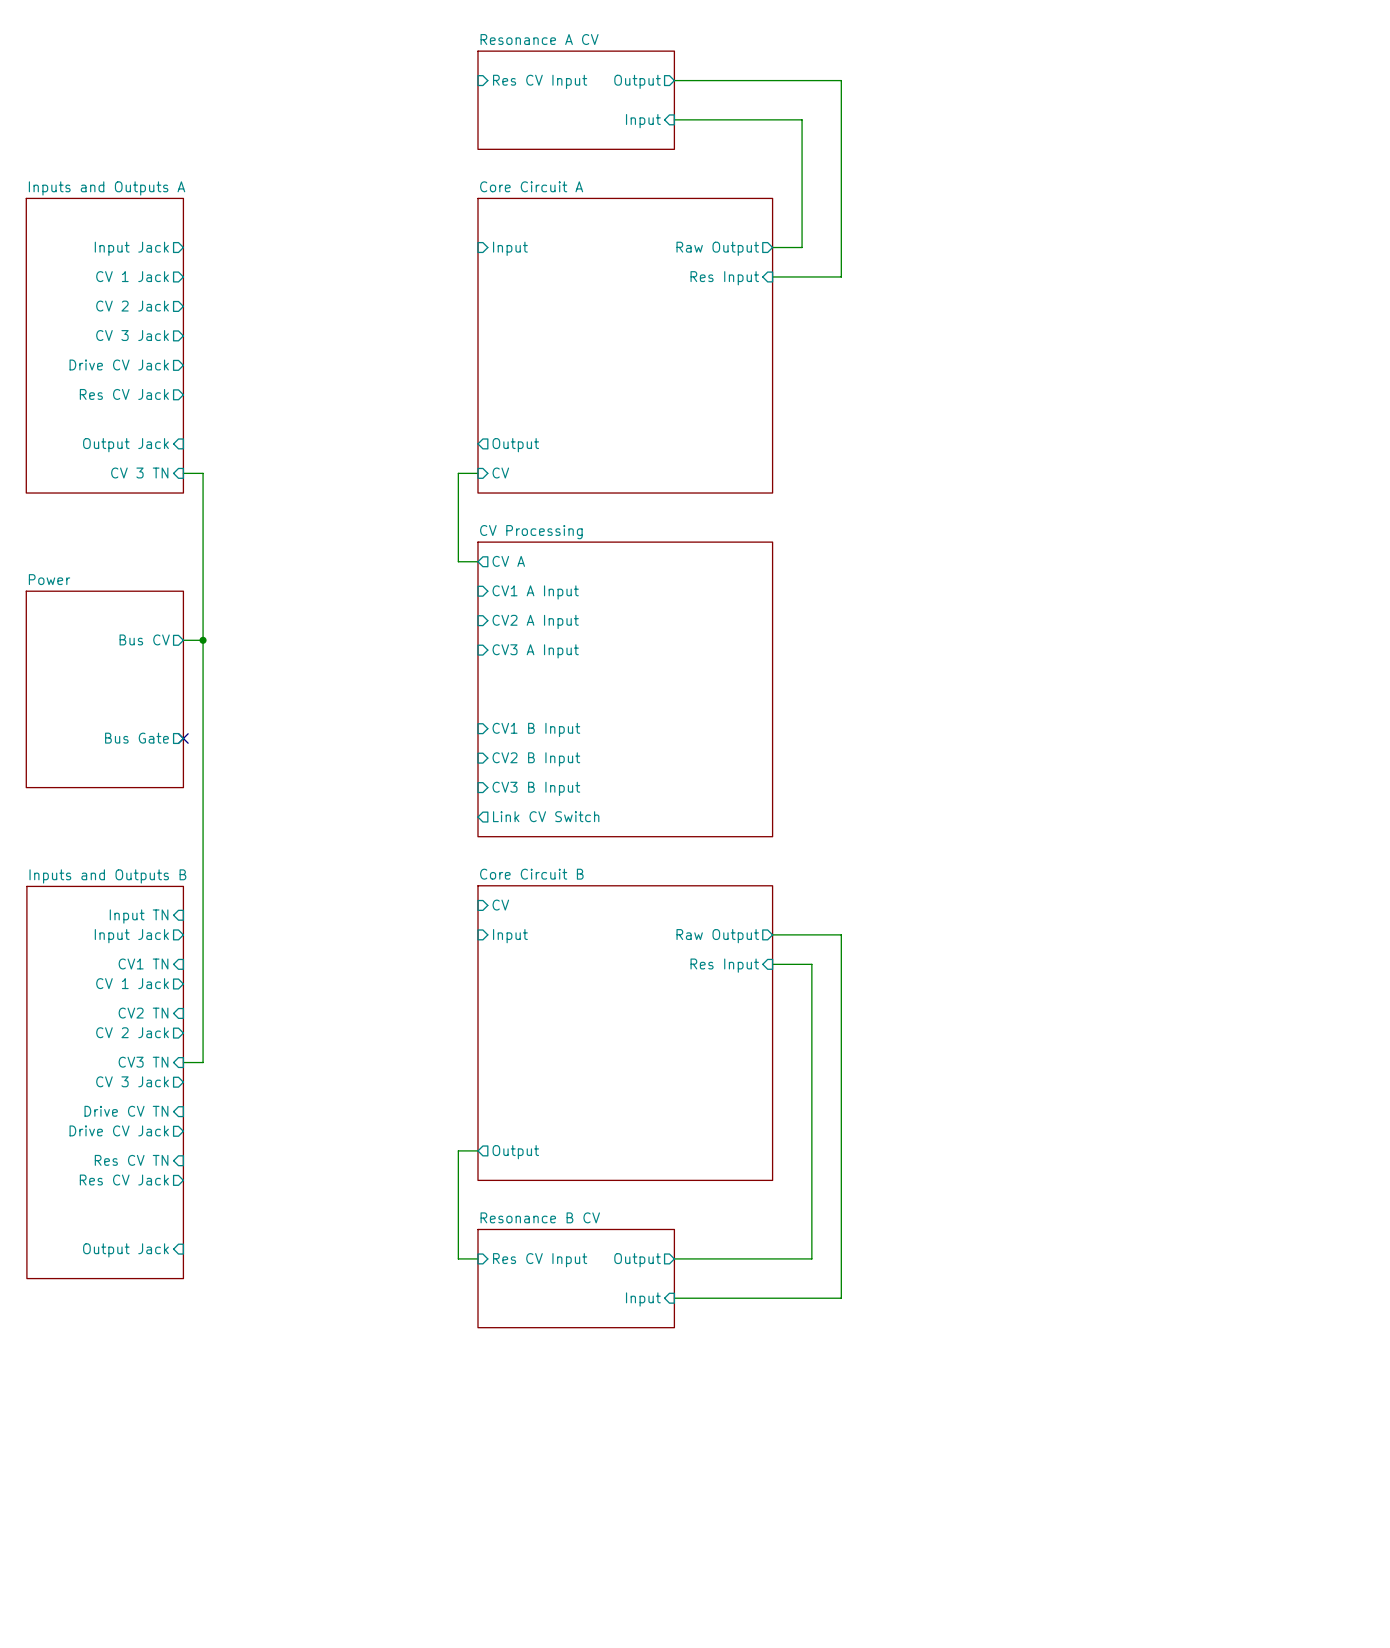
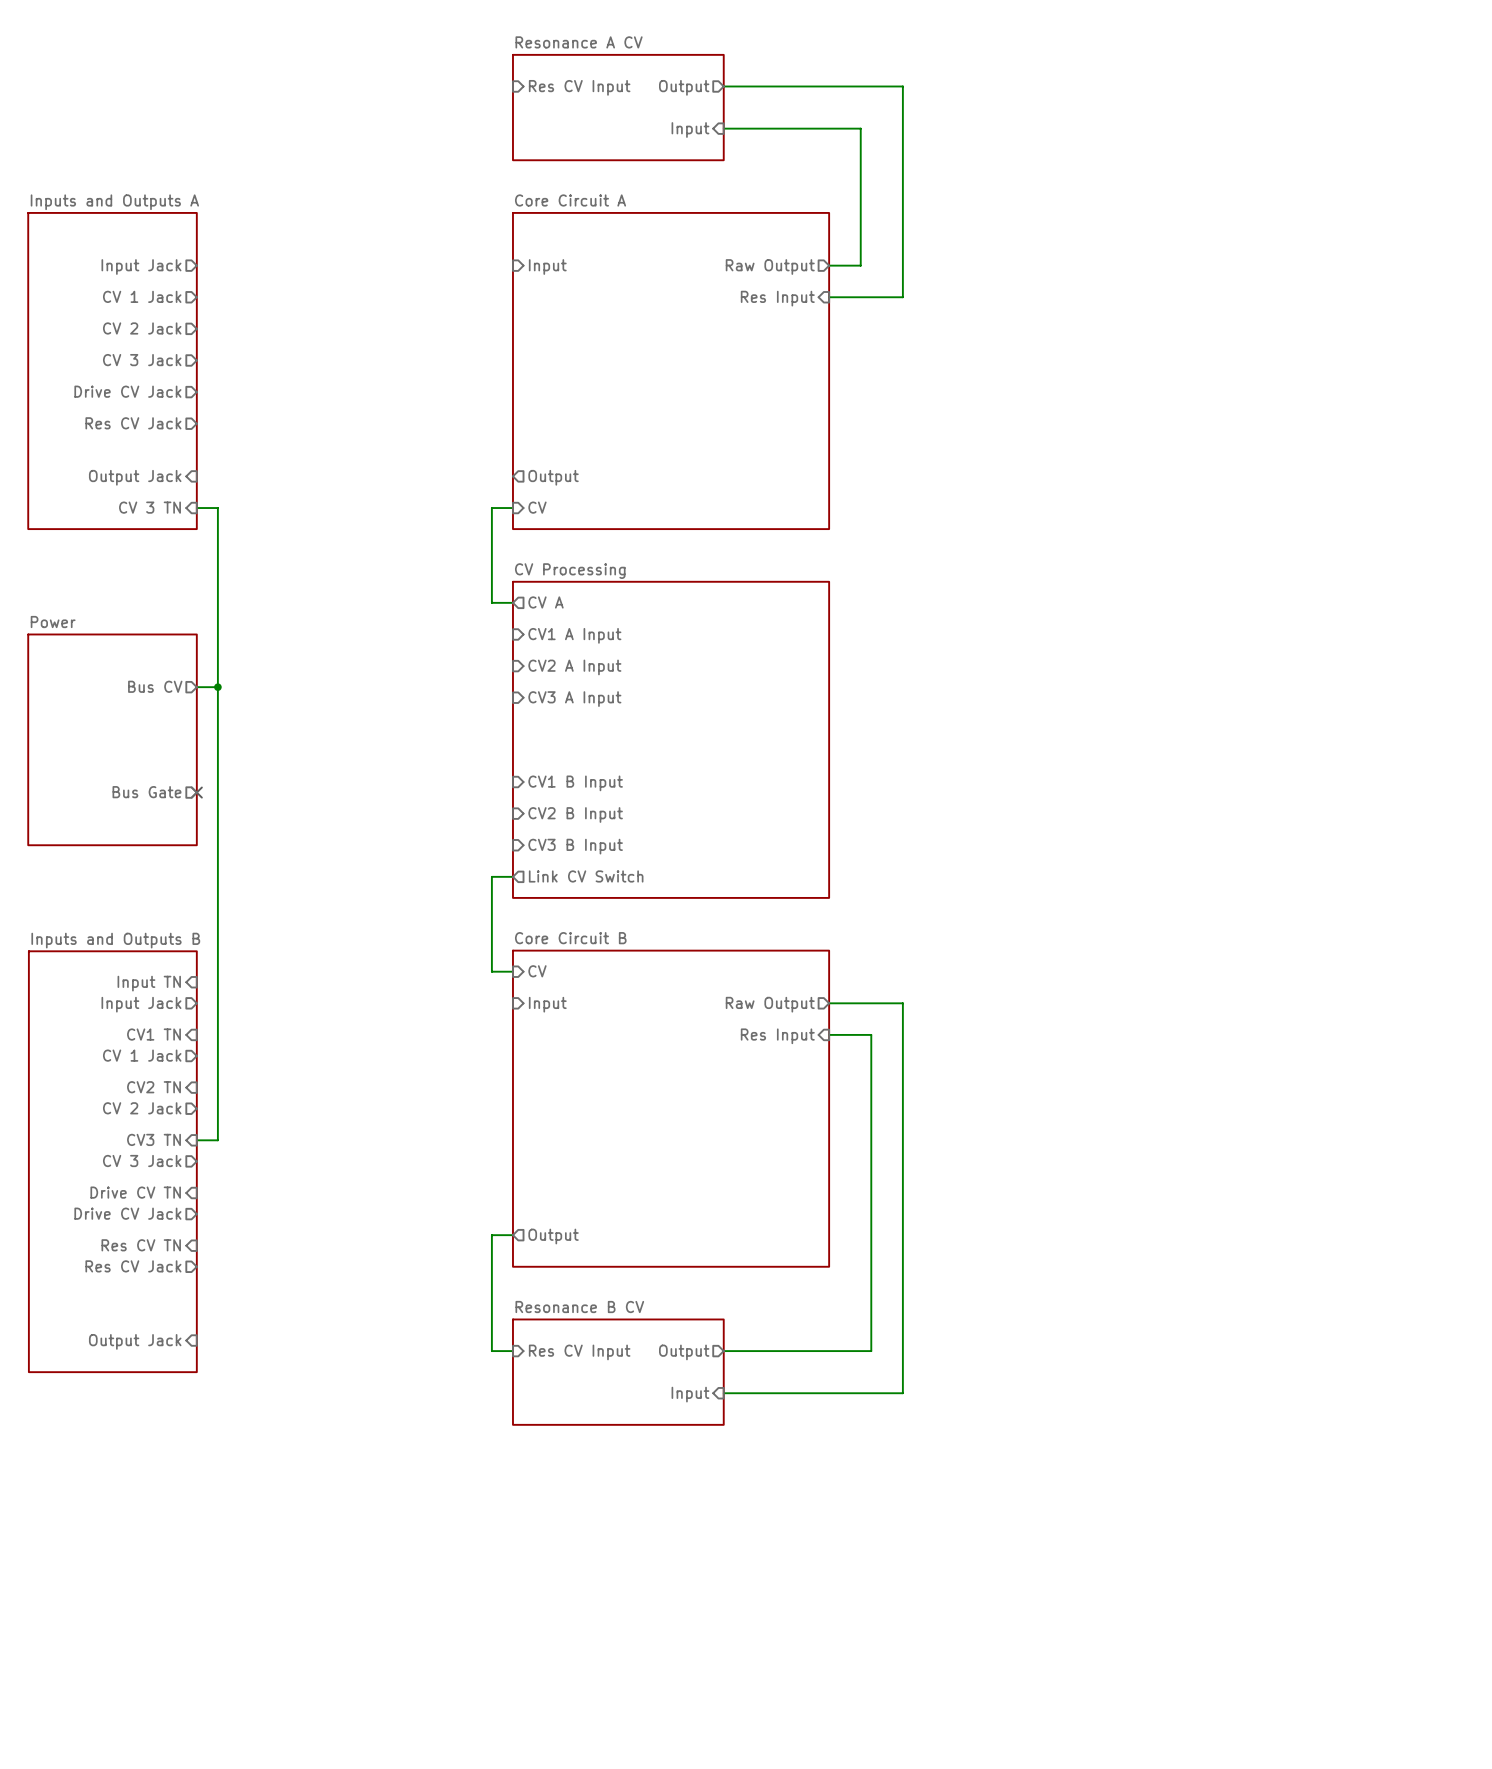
wire: none -> (512, 876) (491, 876) (491, 971) (512, 971)

